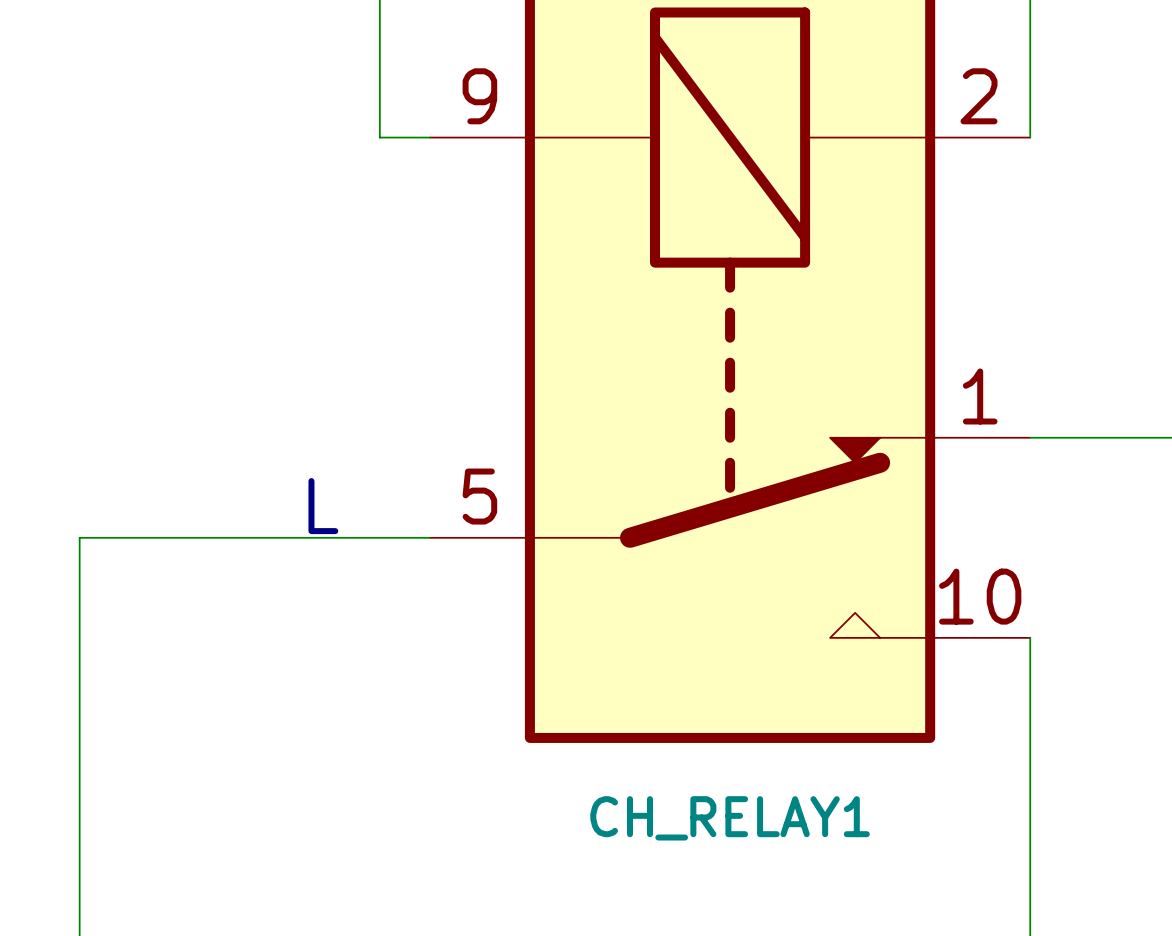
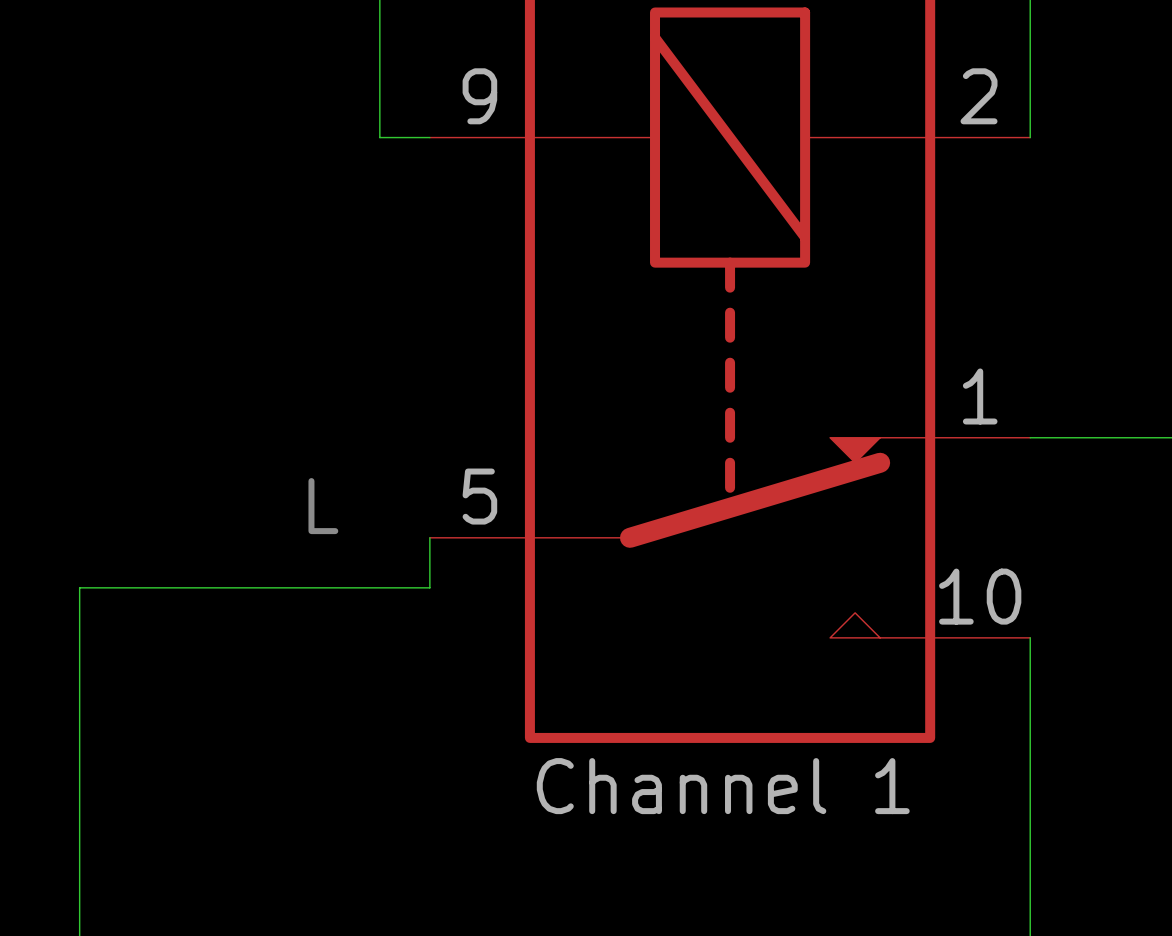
wire: (429, 537) (79, 537) (79, 587) -> (429, 537) (429, 587) (79, 587)
CH_RELAY1 value: none -> Channel 1 (723, 786)
CH_RELAY1 name: CH_RELAY1 (730, 818) -> none

